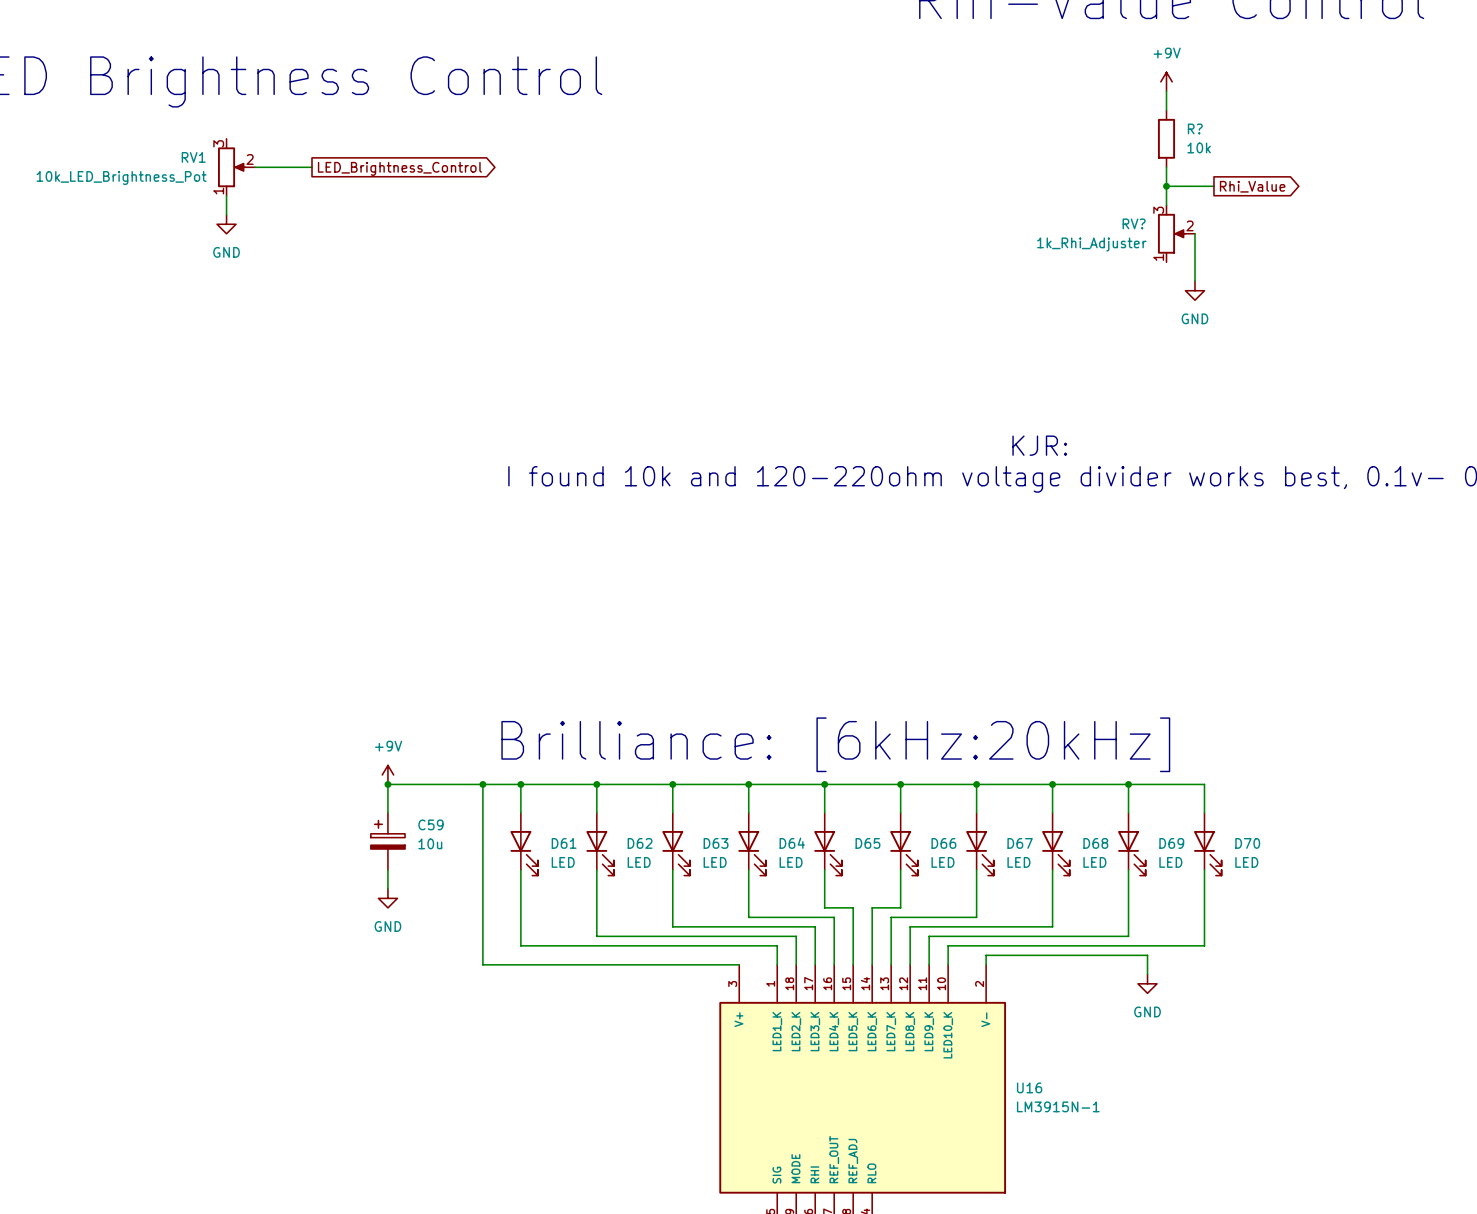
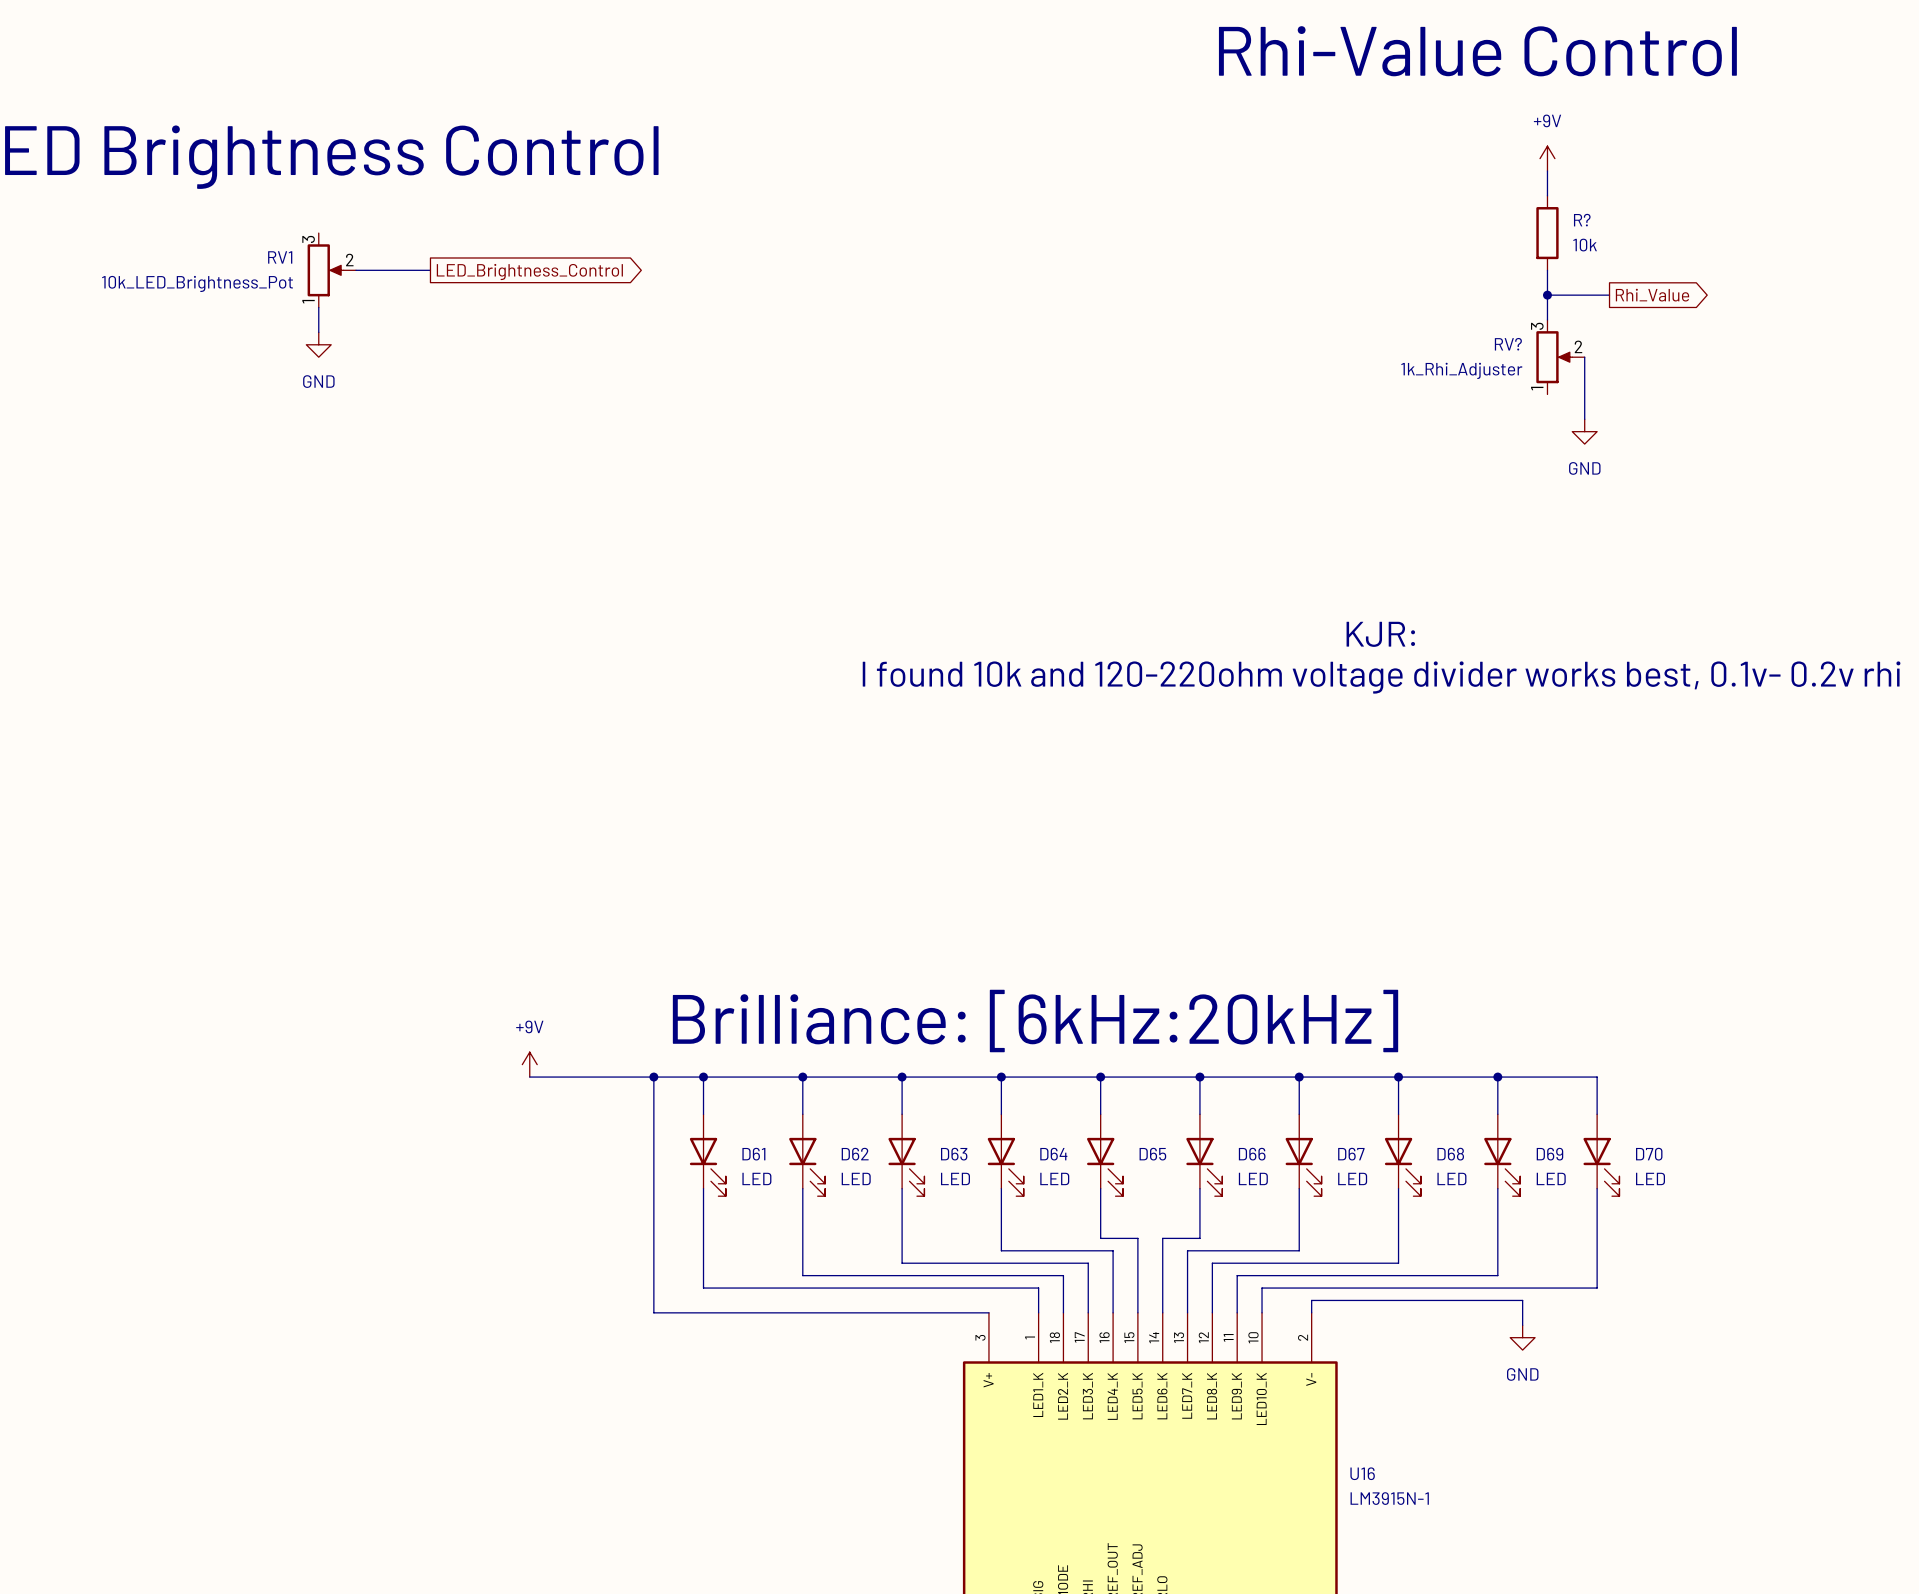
wire: (387, 784) (387, 812) -> none
junction: (387, 784) -> none
C59: 10u (387, 841) -> none
wire: (387, 869) (387, 888) -> none
power symbol: GND (387, 898) -> none

